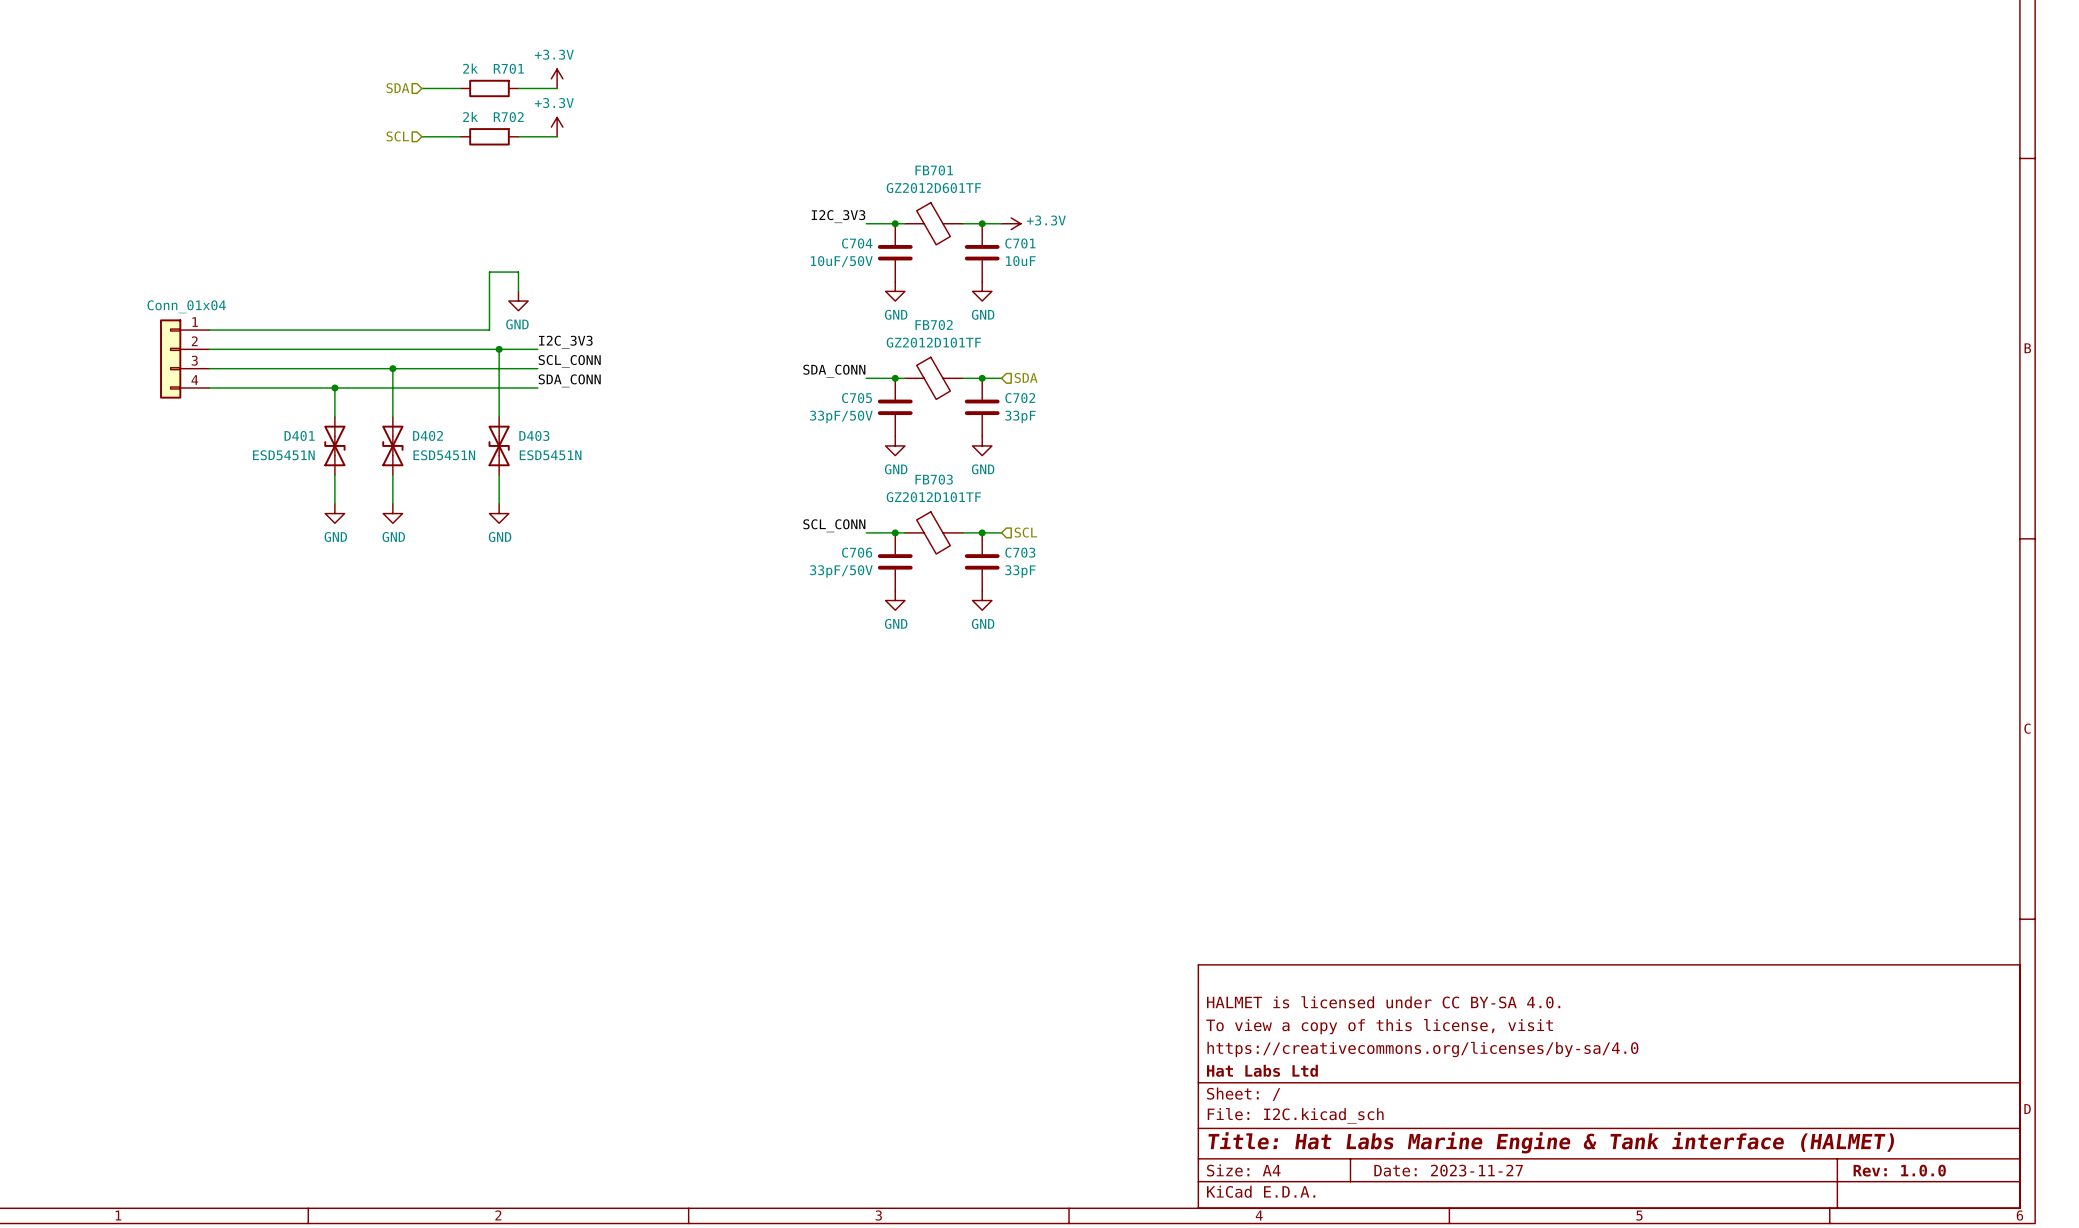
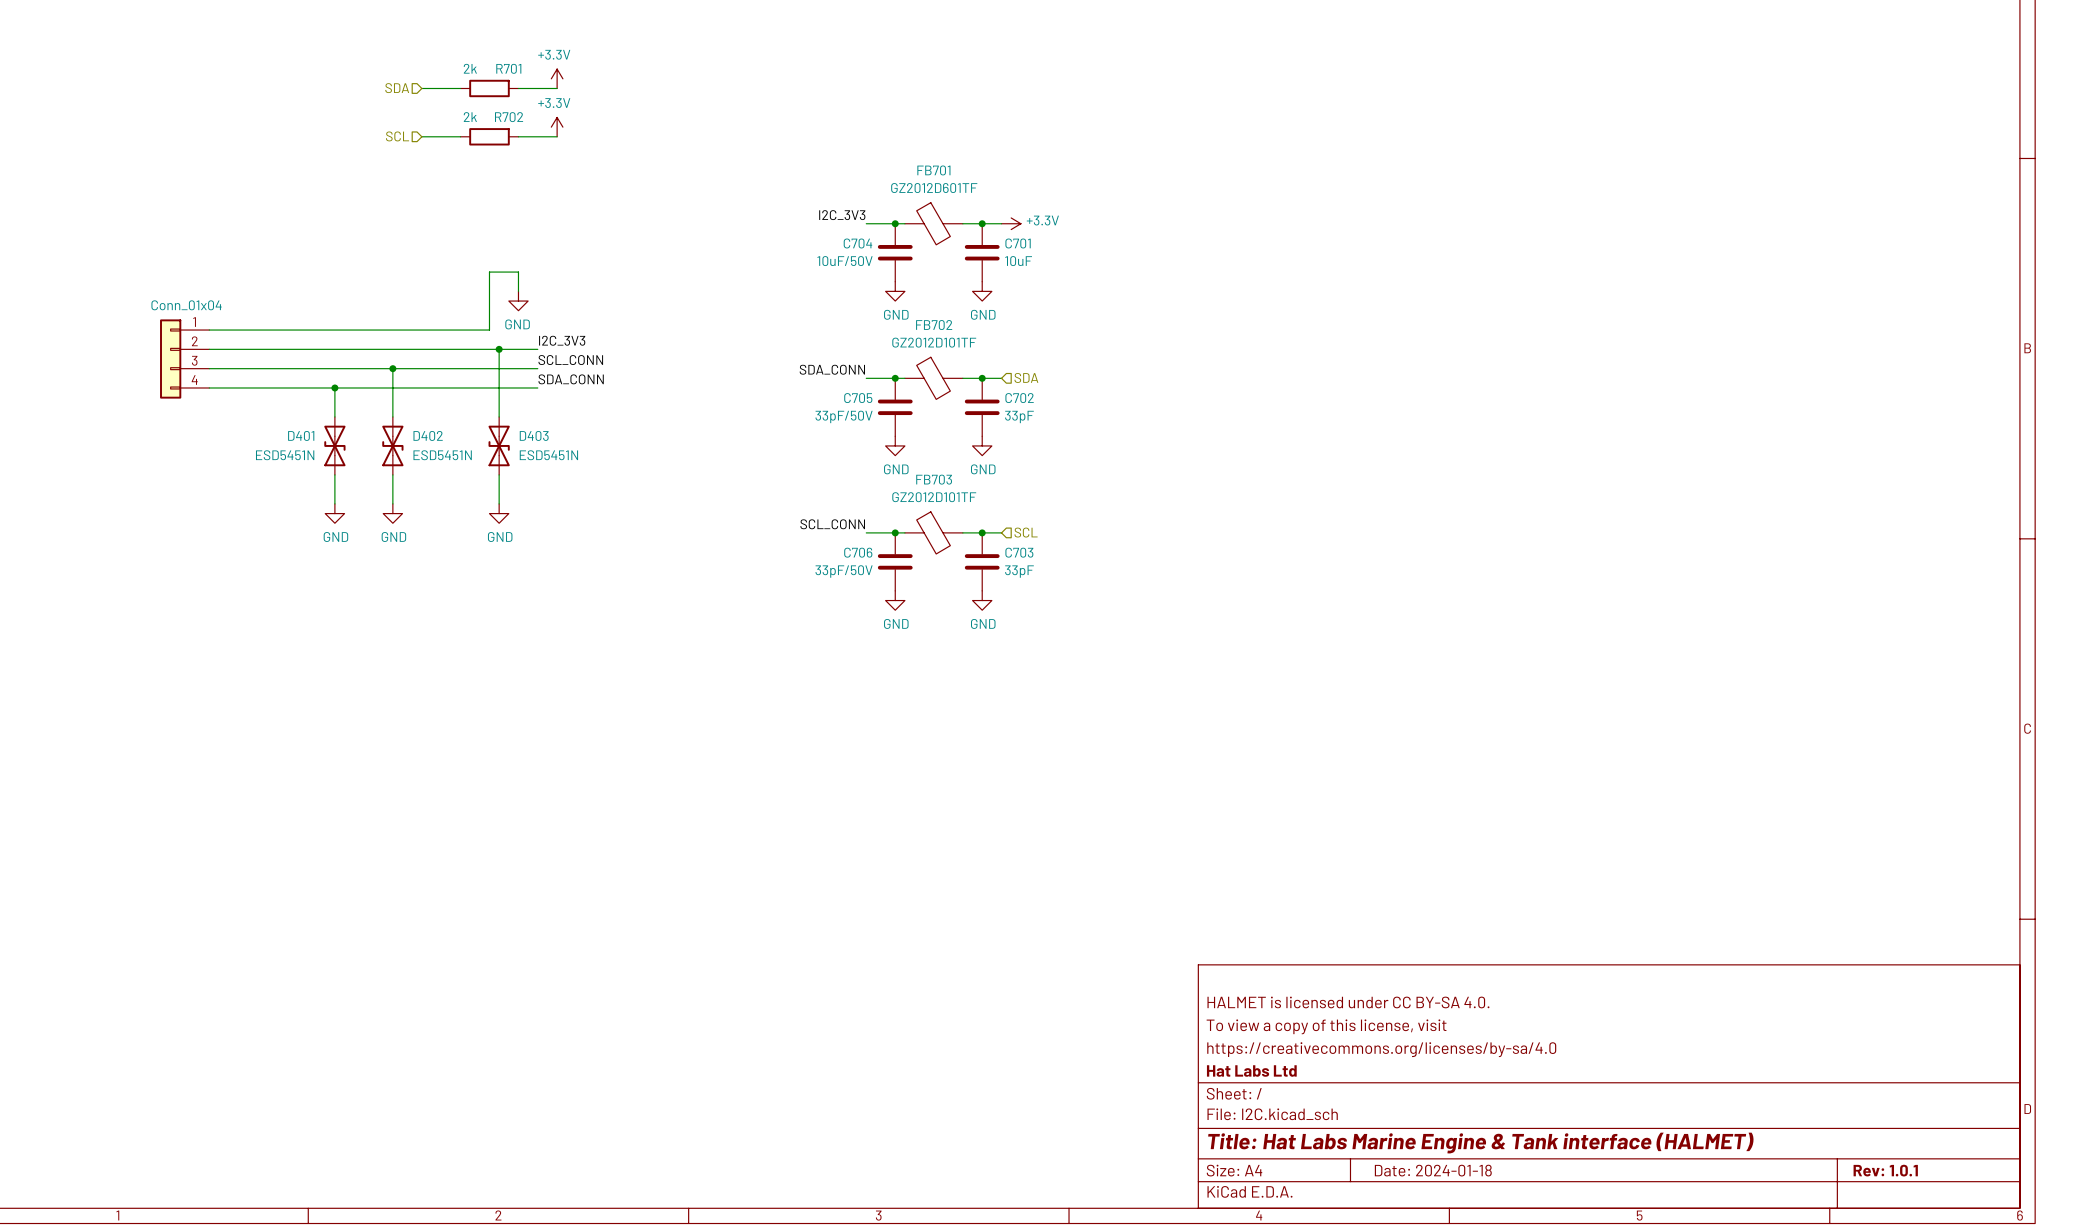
title block: Date: 2023-11-27 (1448, 1170) -> Date: 2024-01-18 (1433, 1170)
title block: Rev: 1.0.0 (1899, 1170) -> Rev: 1.0.1 (1885, 1170)

